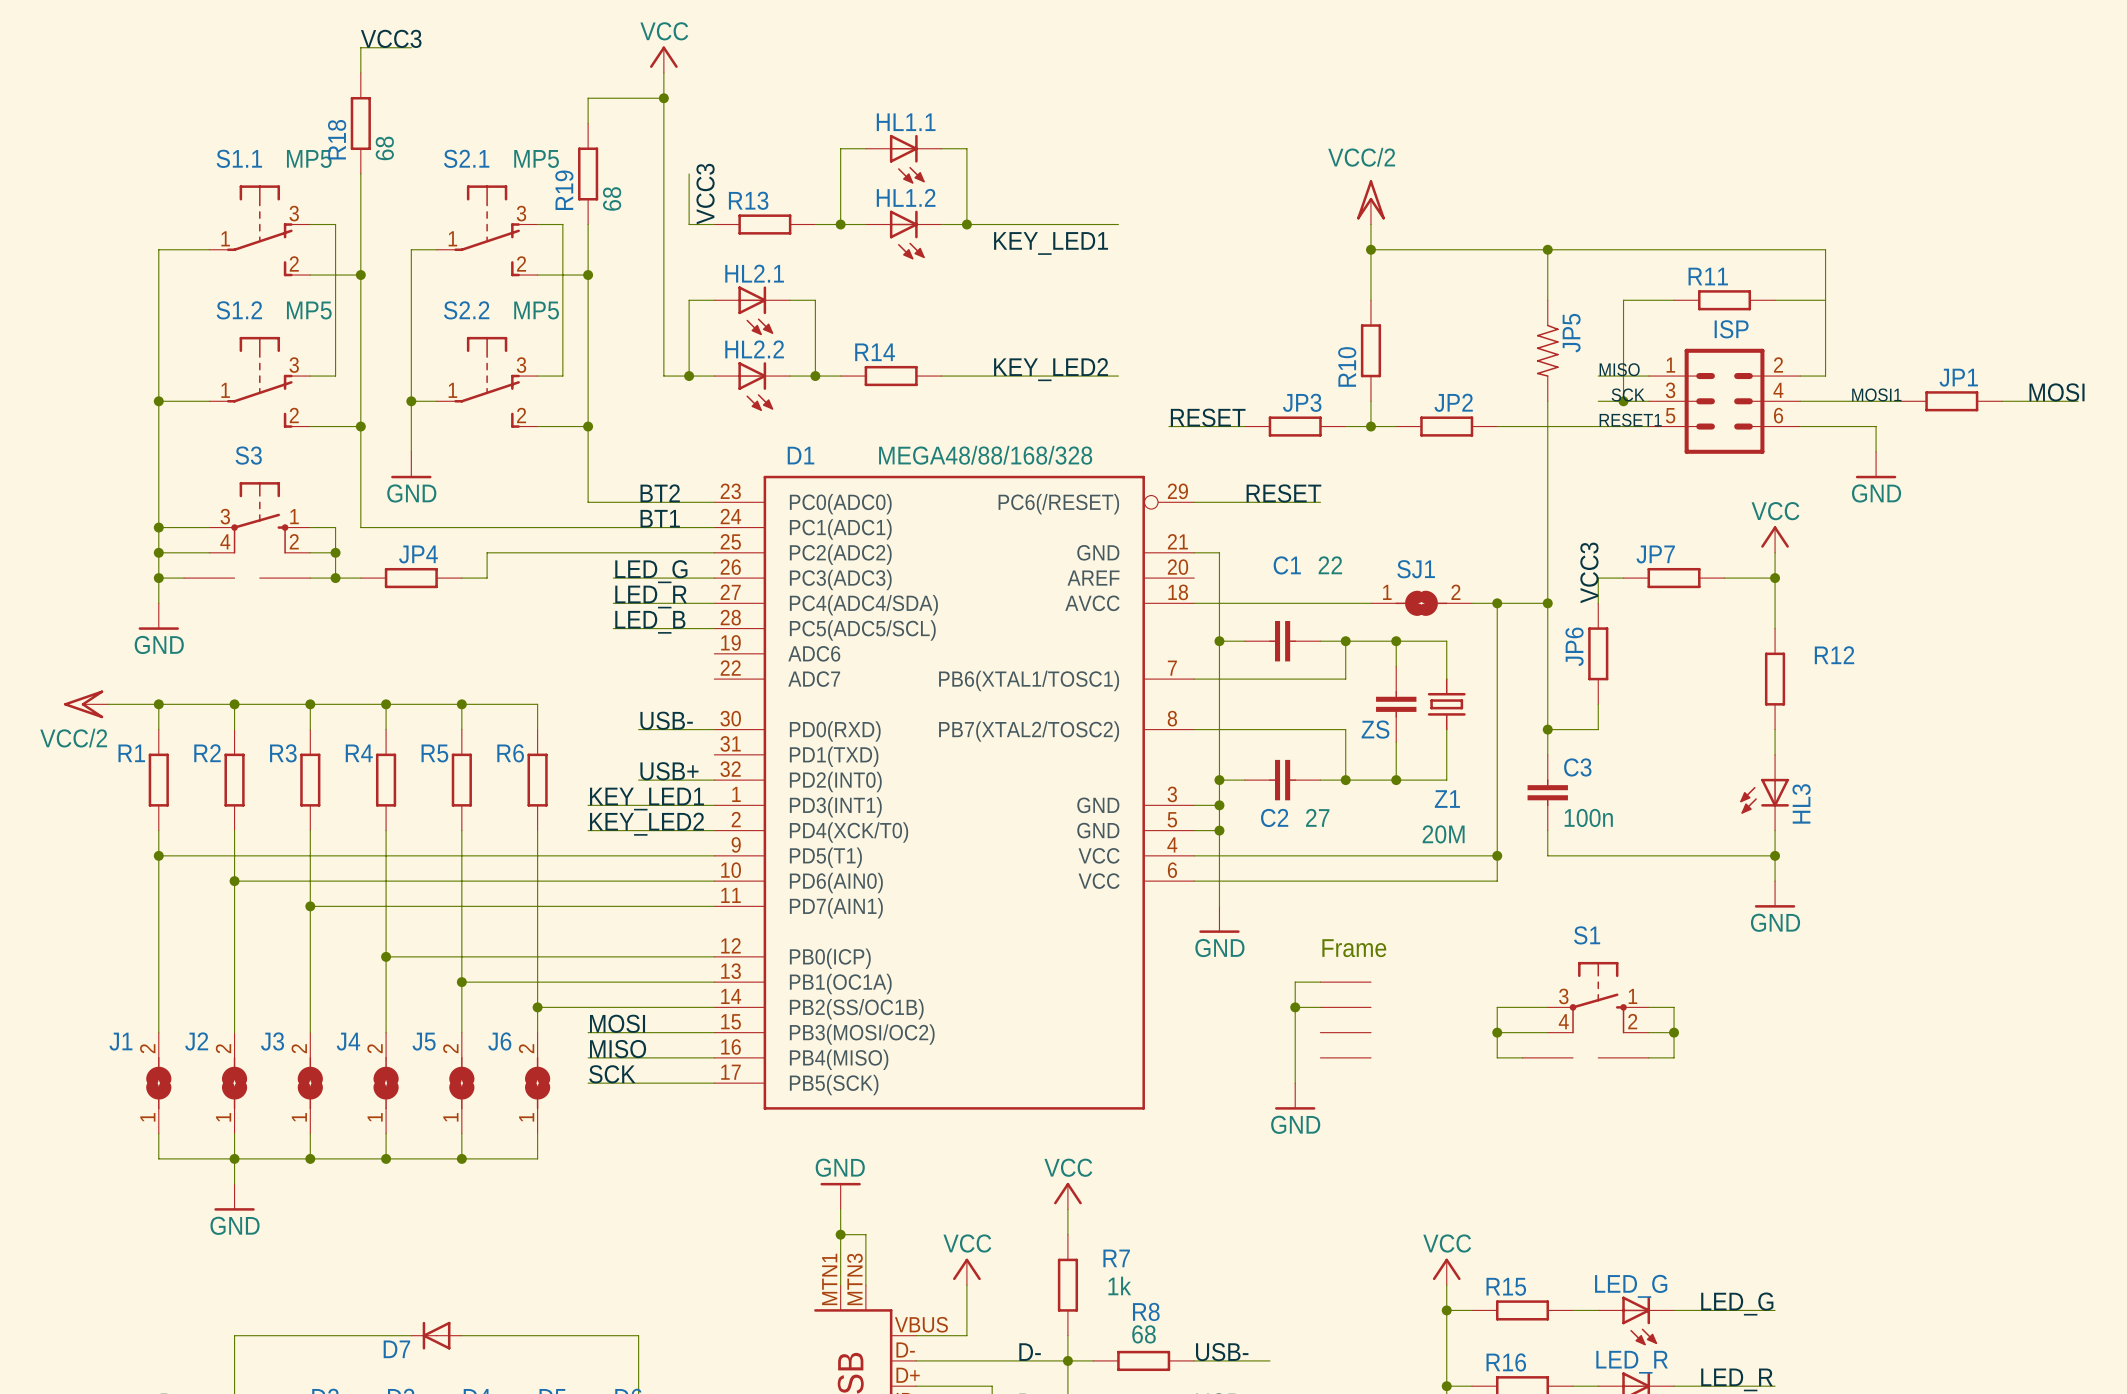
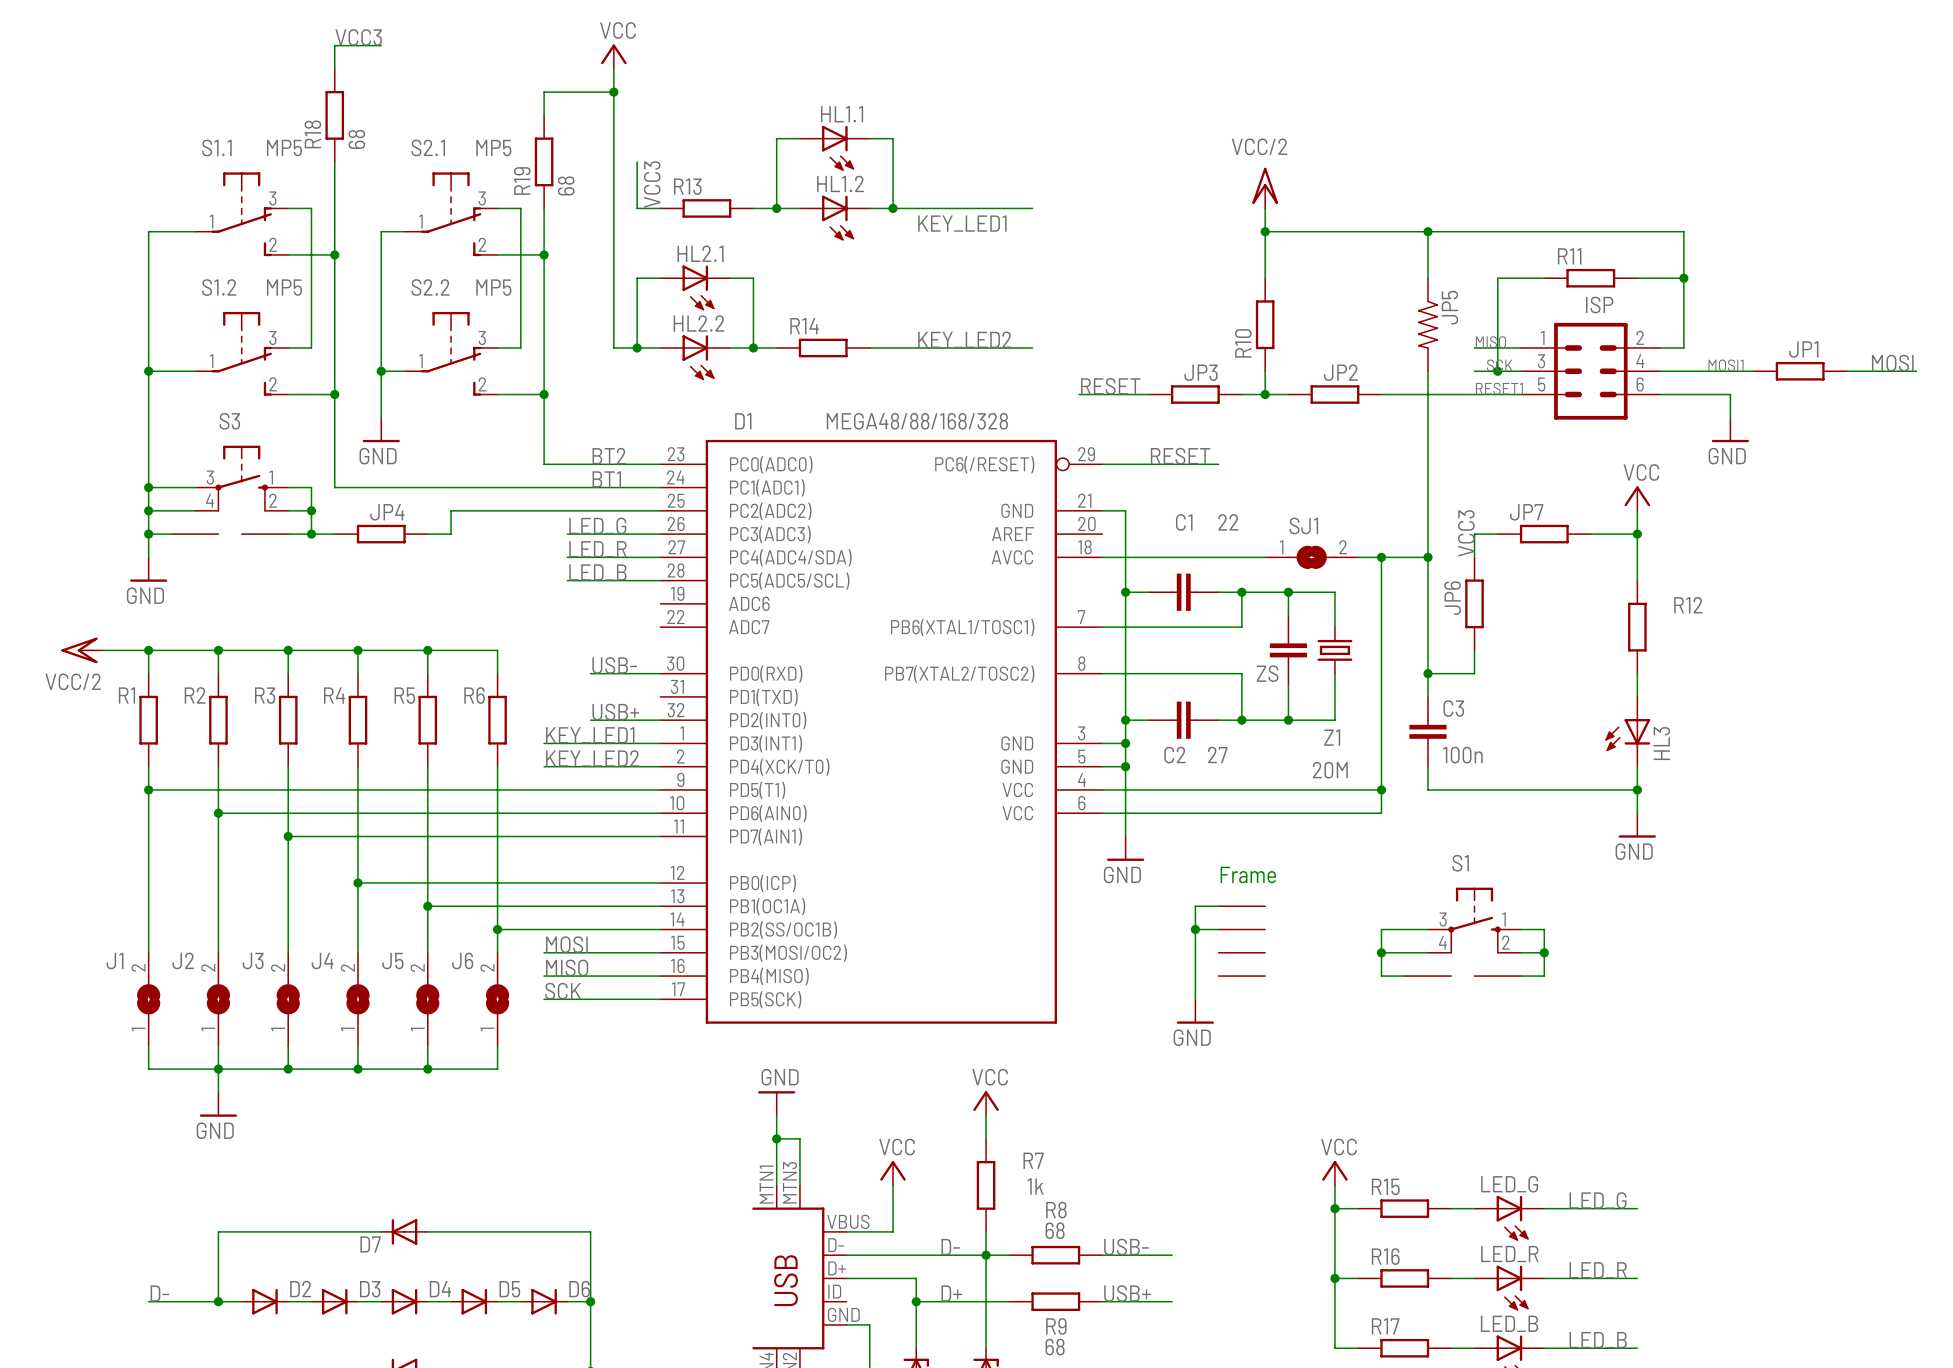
junction: none -> (1683, 278)

